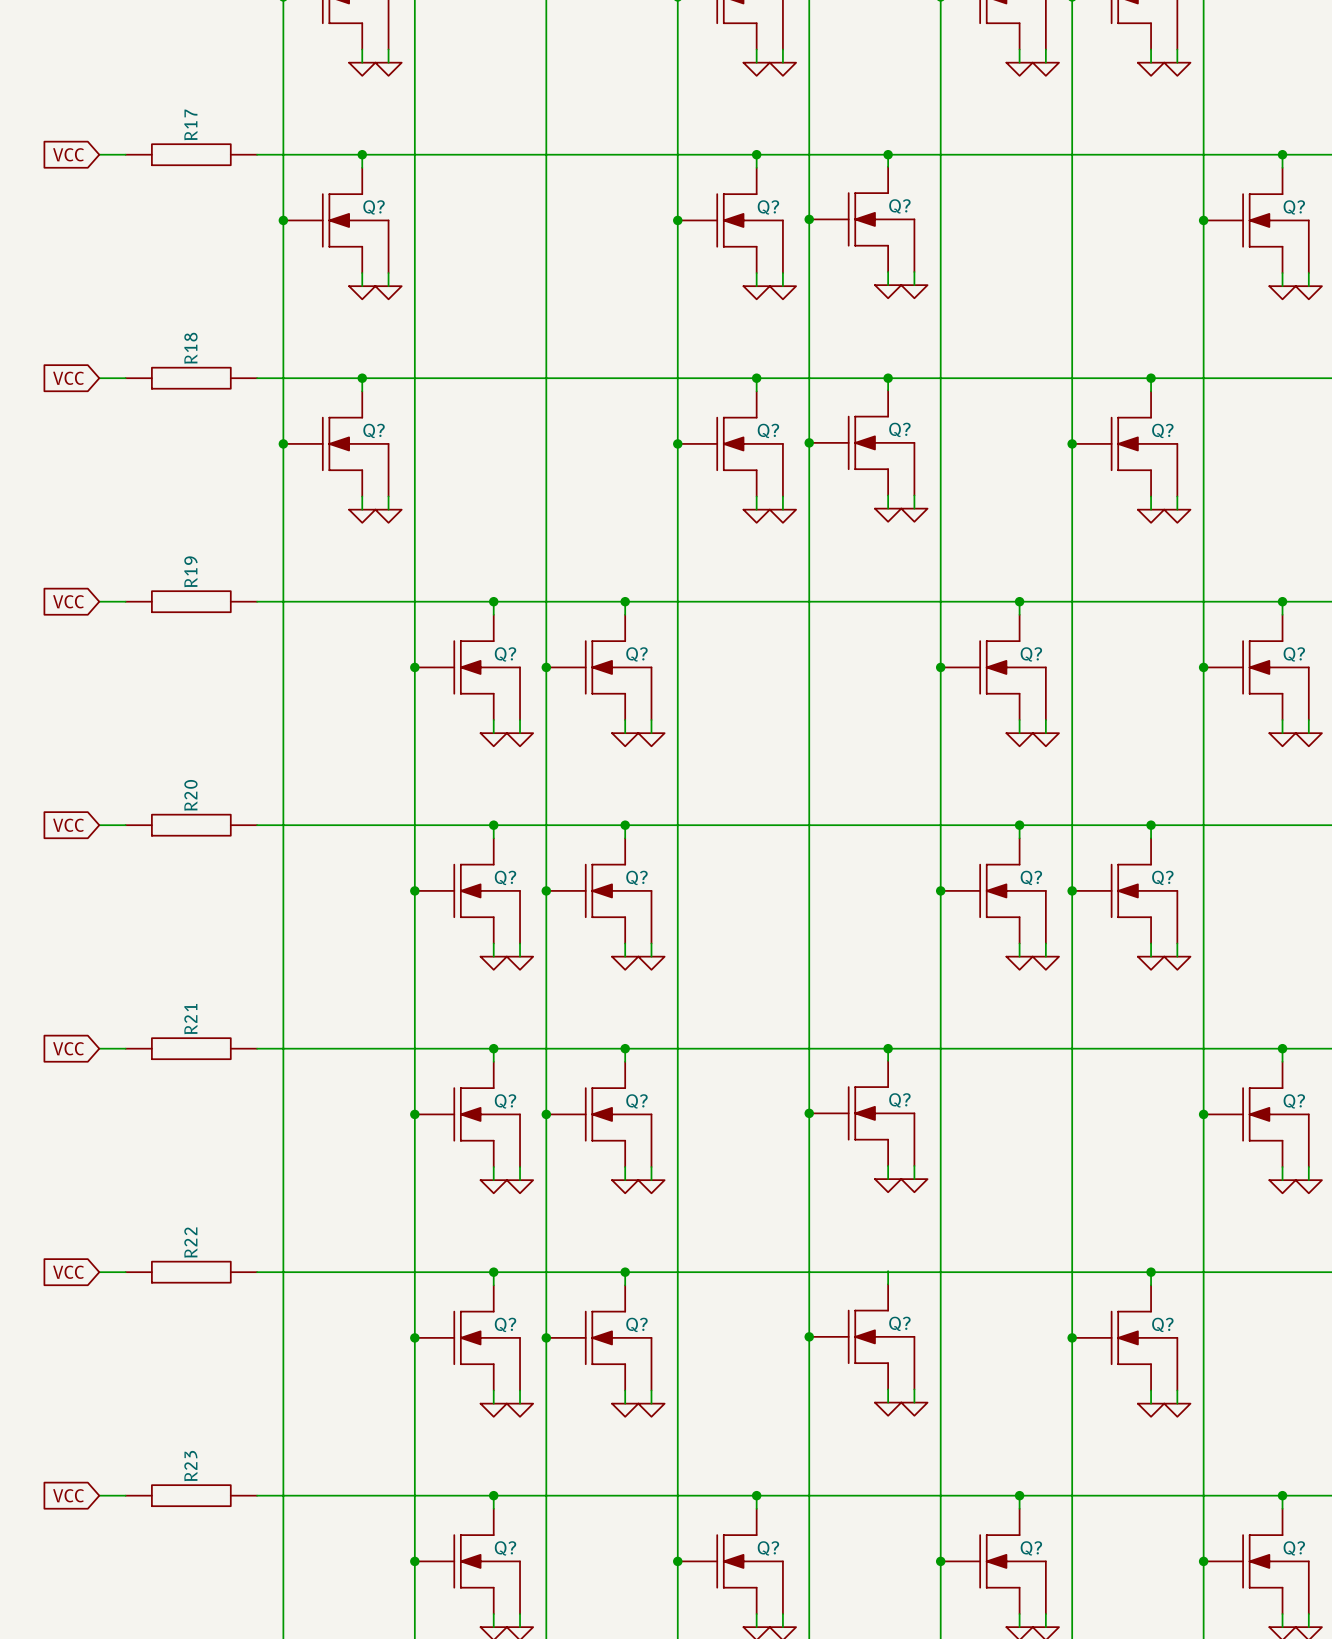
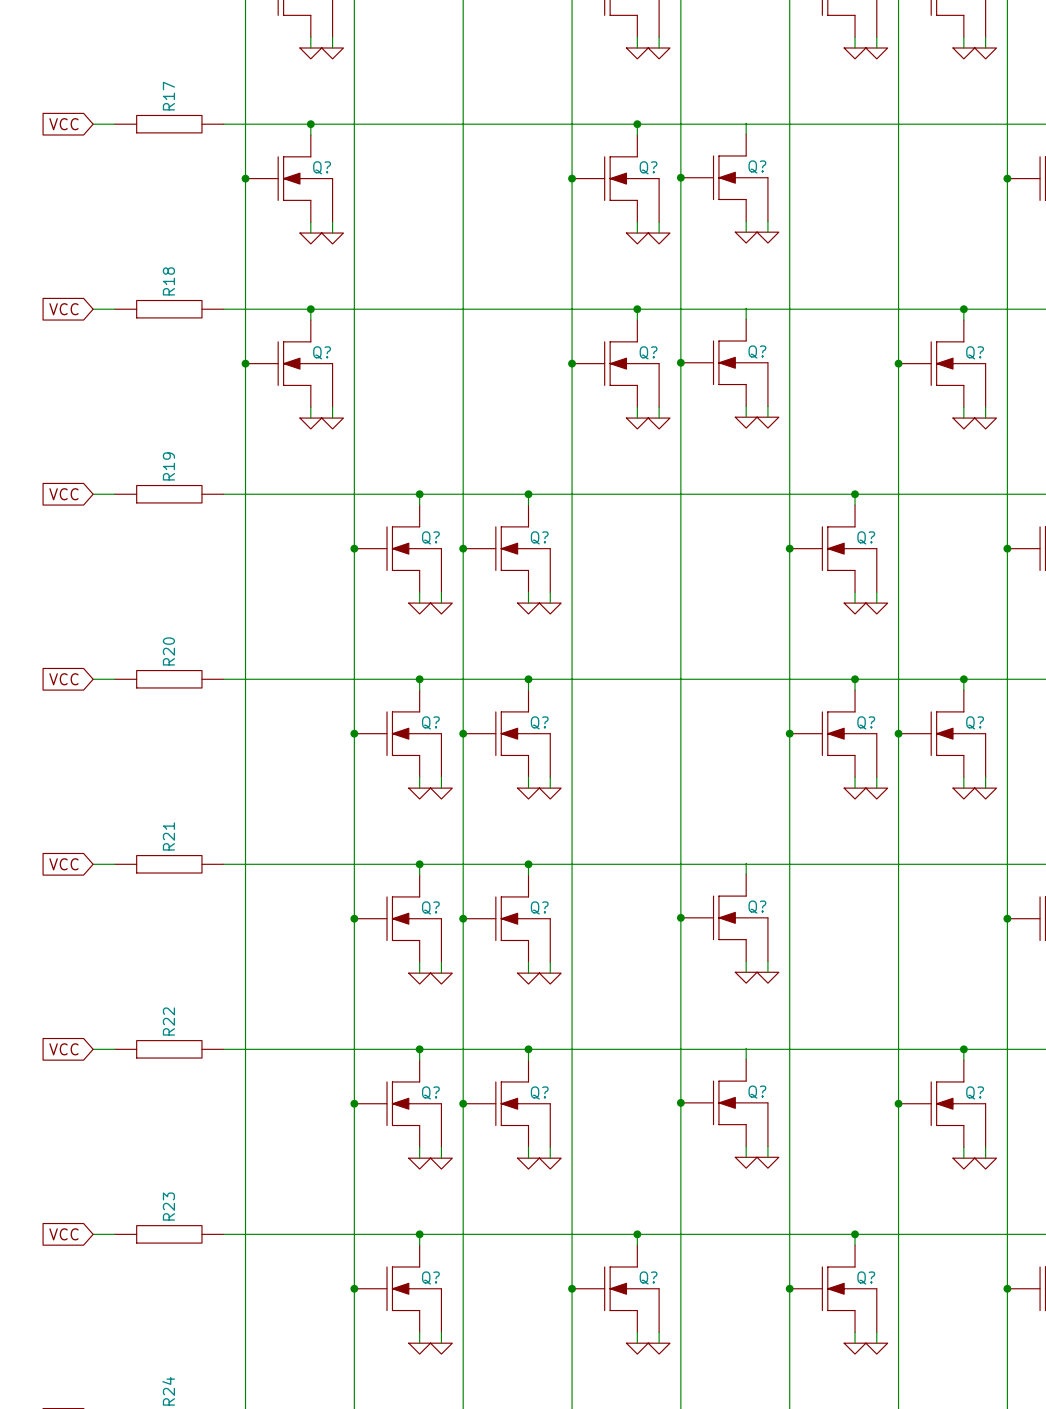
junction: (888, 154) -> none
junction: (888, 378) -> none
junction: (888, 1048) -> none

